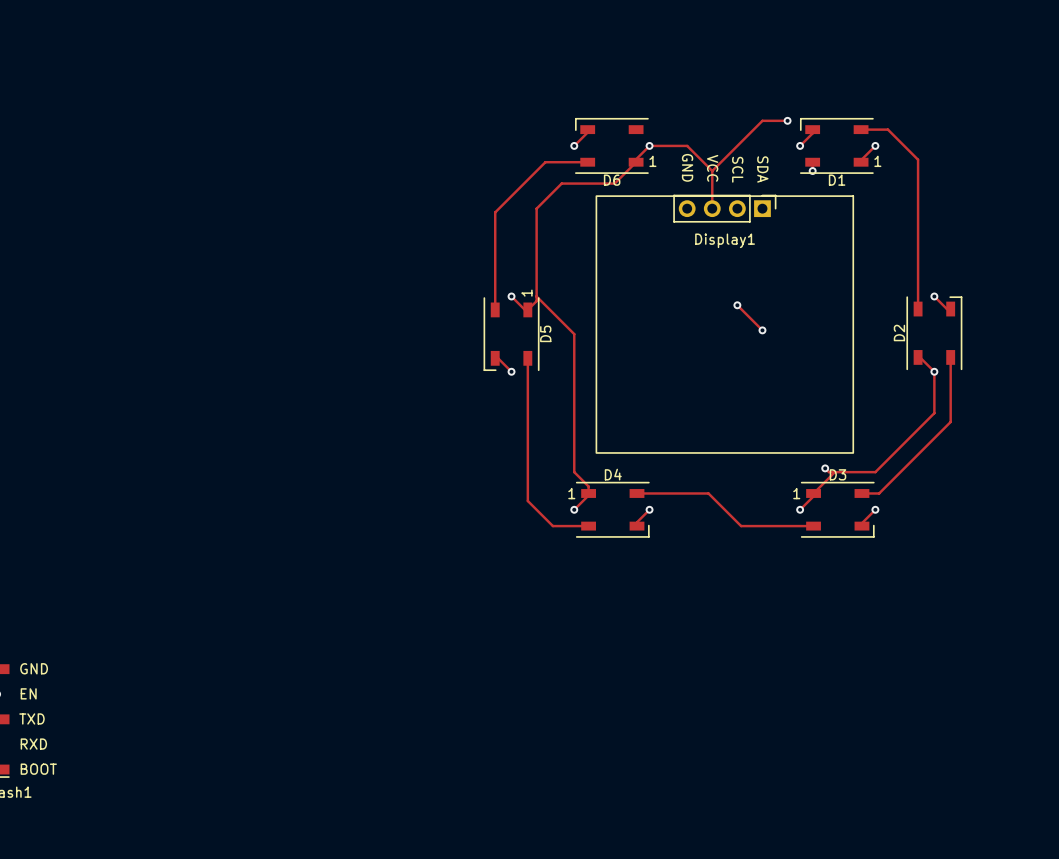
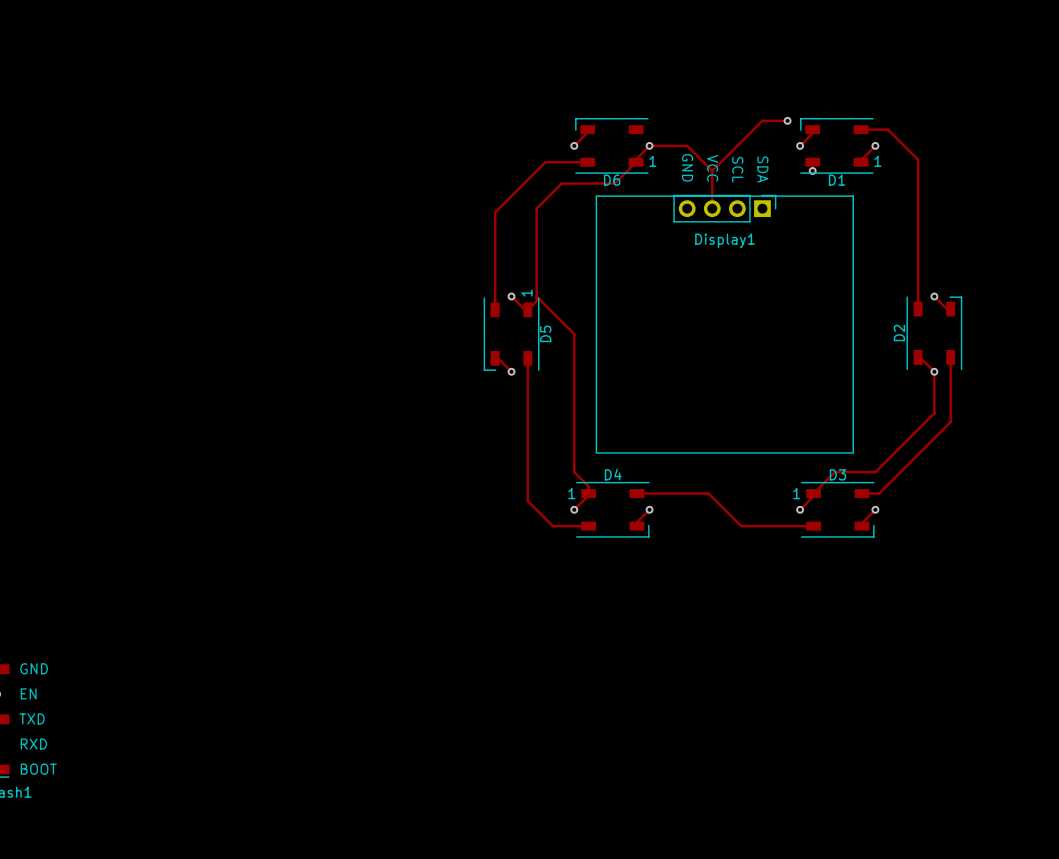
track: (737, 305) (762, 330) -> none
via: (737, 305) -> none
via: (762, 330) -> none
track: (825, 468) (828, 472) (834, 472) -> none
via: (825, 468) -> none

